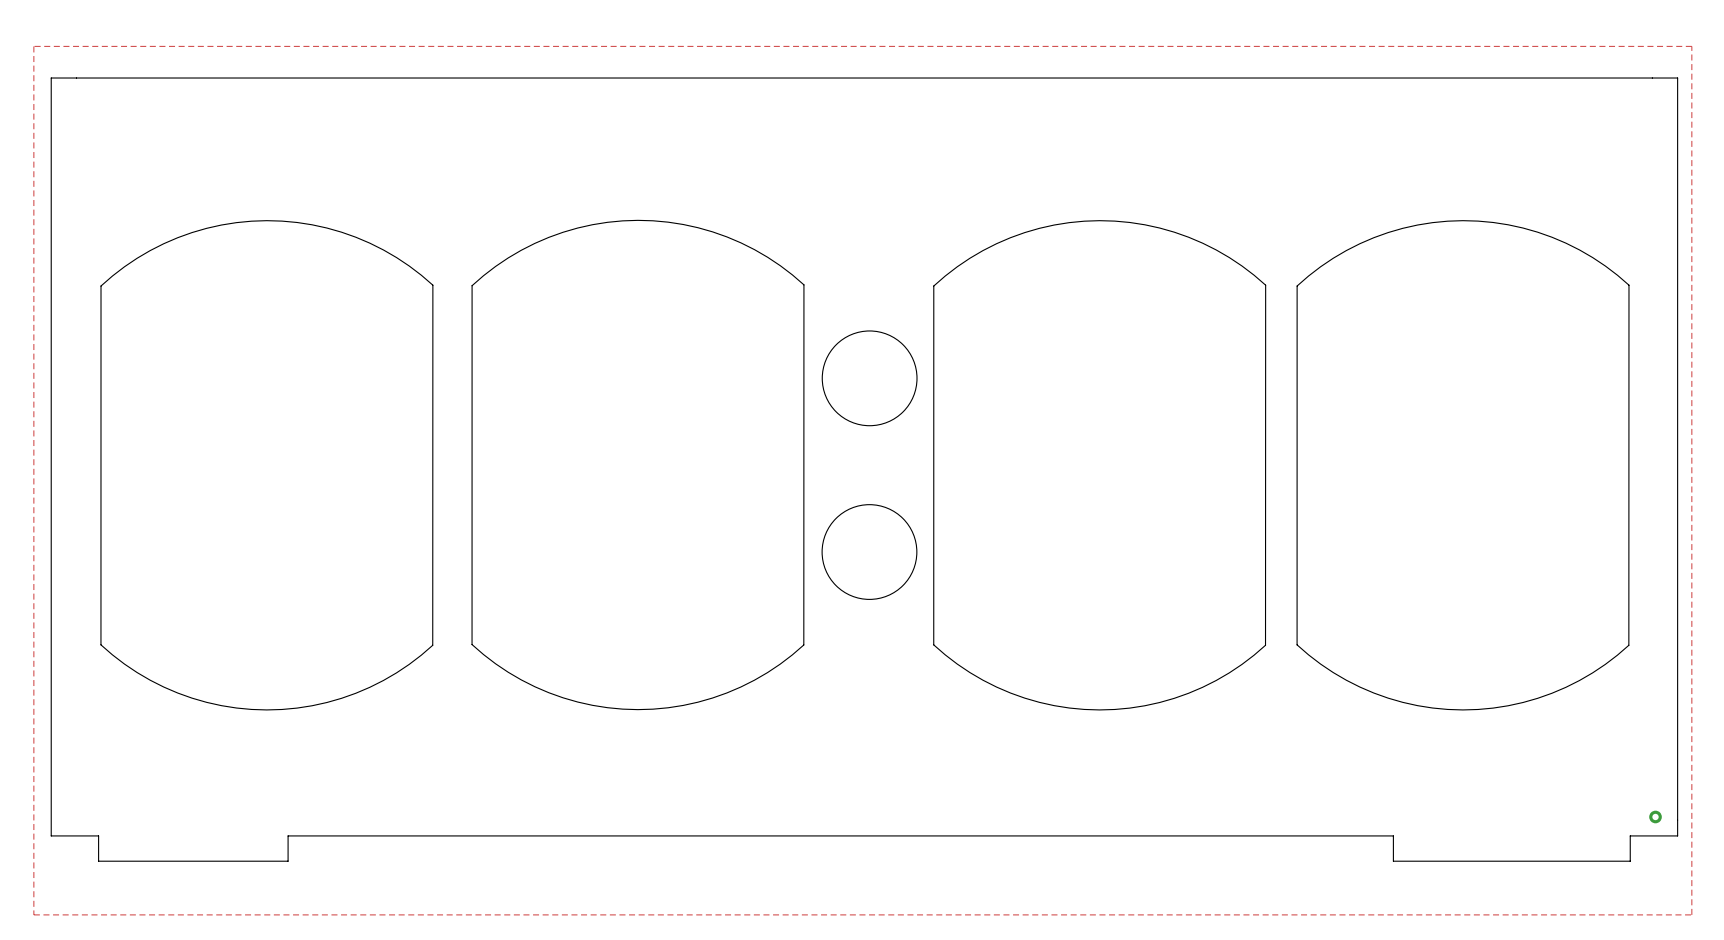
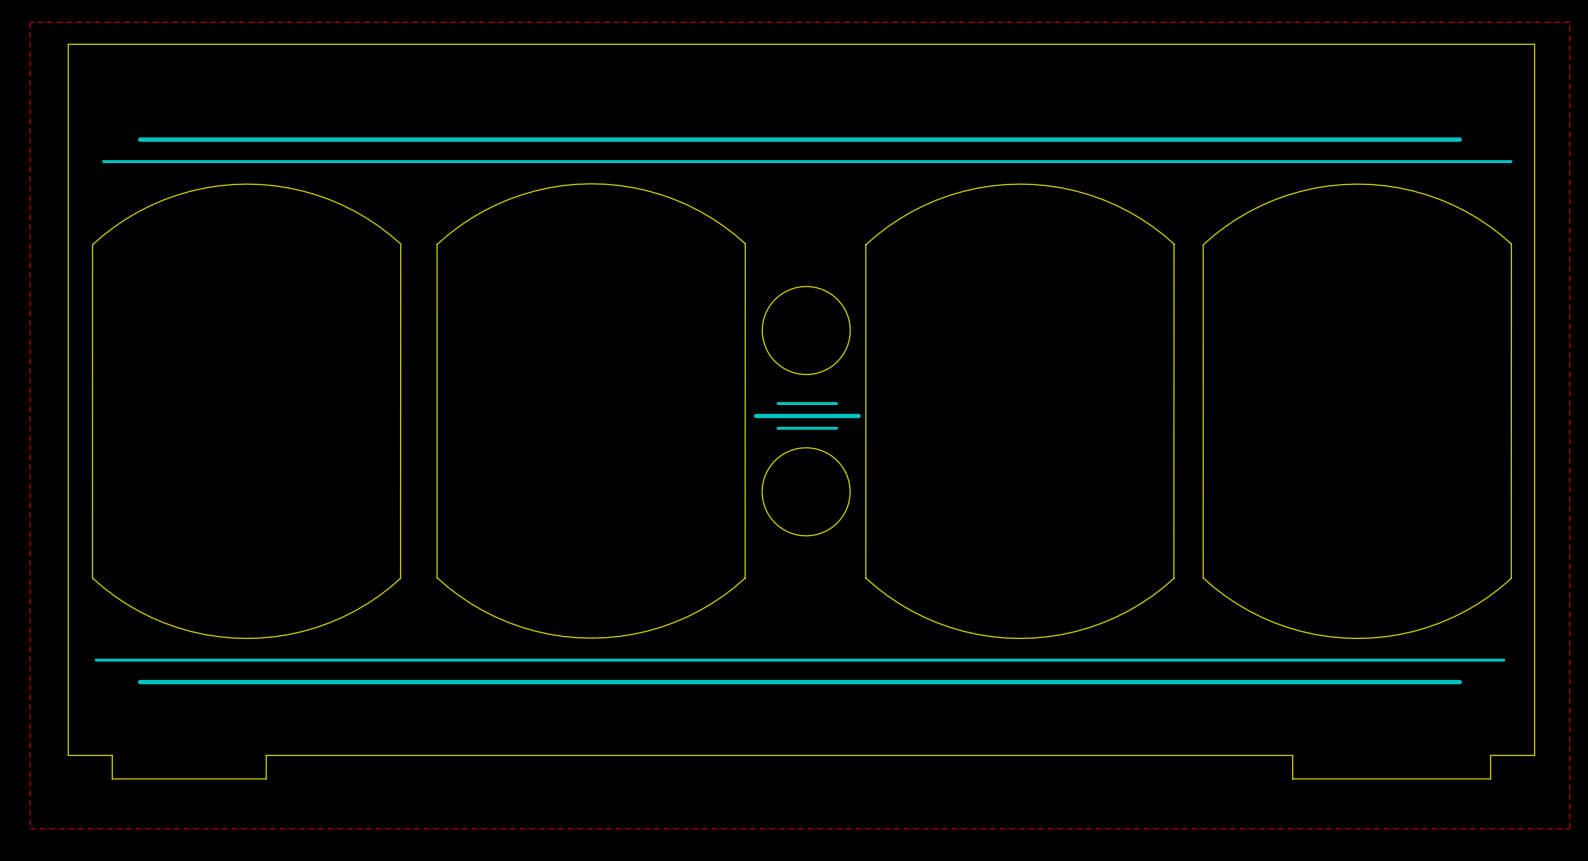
line: none -> (140, 139) (1459, 139)
line: none -> (103, 161) (1511, 161)
line: none -> (777, 403) (836, 403)
line: none -> (755, 416) (858, 416)
line: none -> (777, 428) (836, 428)
line: none -> (96, 660) (1503, 660)
line: none -> (140, 682) (1459, 682)
via: (1655, 816) -> none
board edge: (74, 835) (51, 835) (51, 78) (1677, 78) (1677, 835) (1653, 835) -> (68, 755) (68, 44) (1534, 44) (1534, 755)
board edge: (98, 835) (98, 861) (122, 861) -> (90, 755) (112, 755) (112, 778)
board edge: (1630, 835) (1630, 861) (1606, 861) -> (1512, 755) (1490, 755) (1490, 778)

